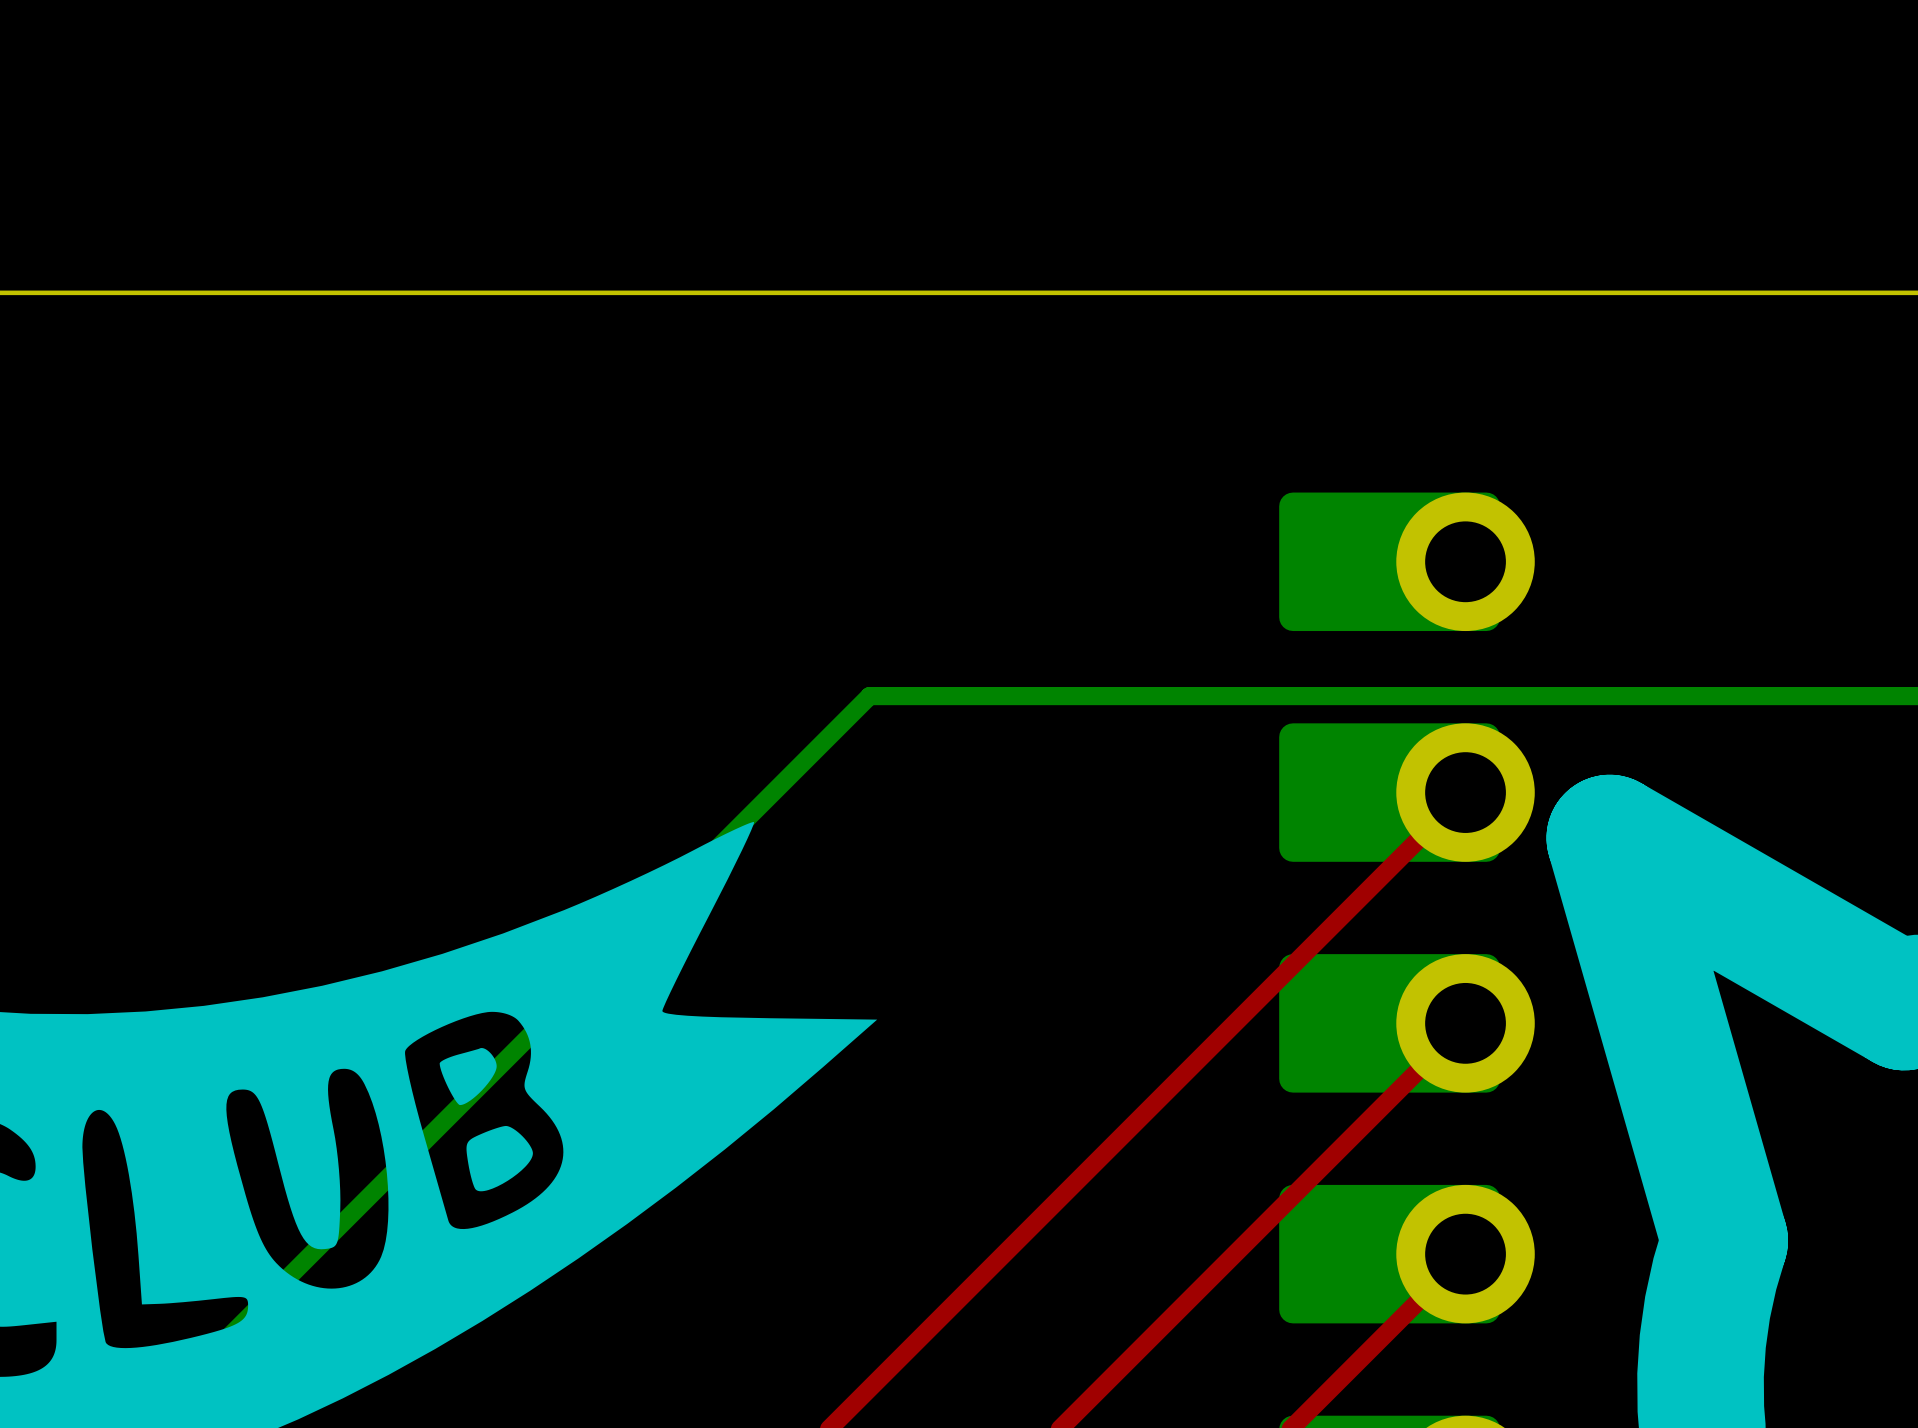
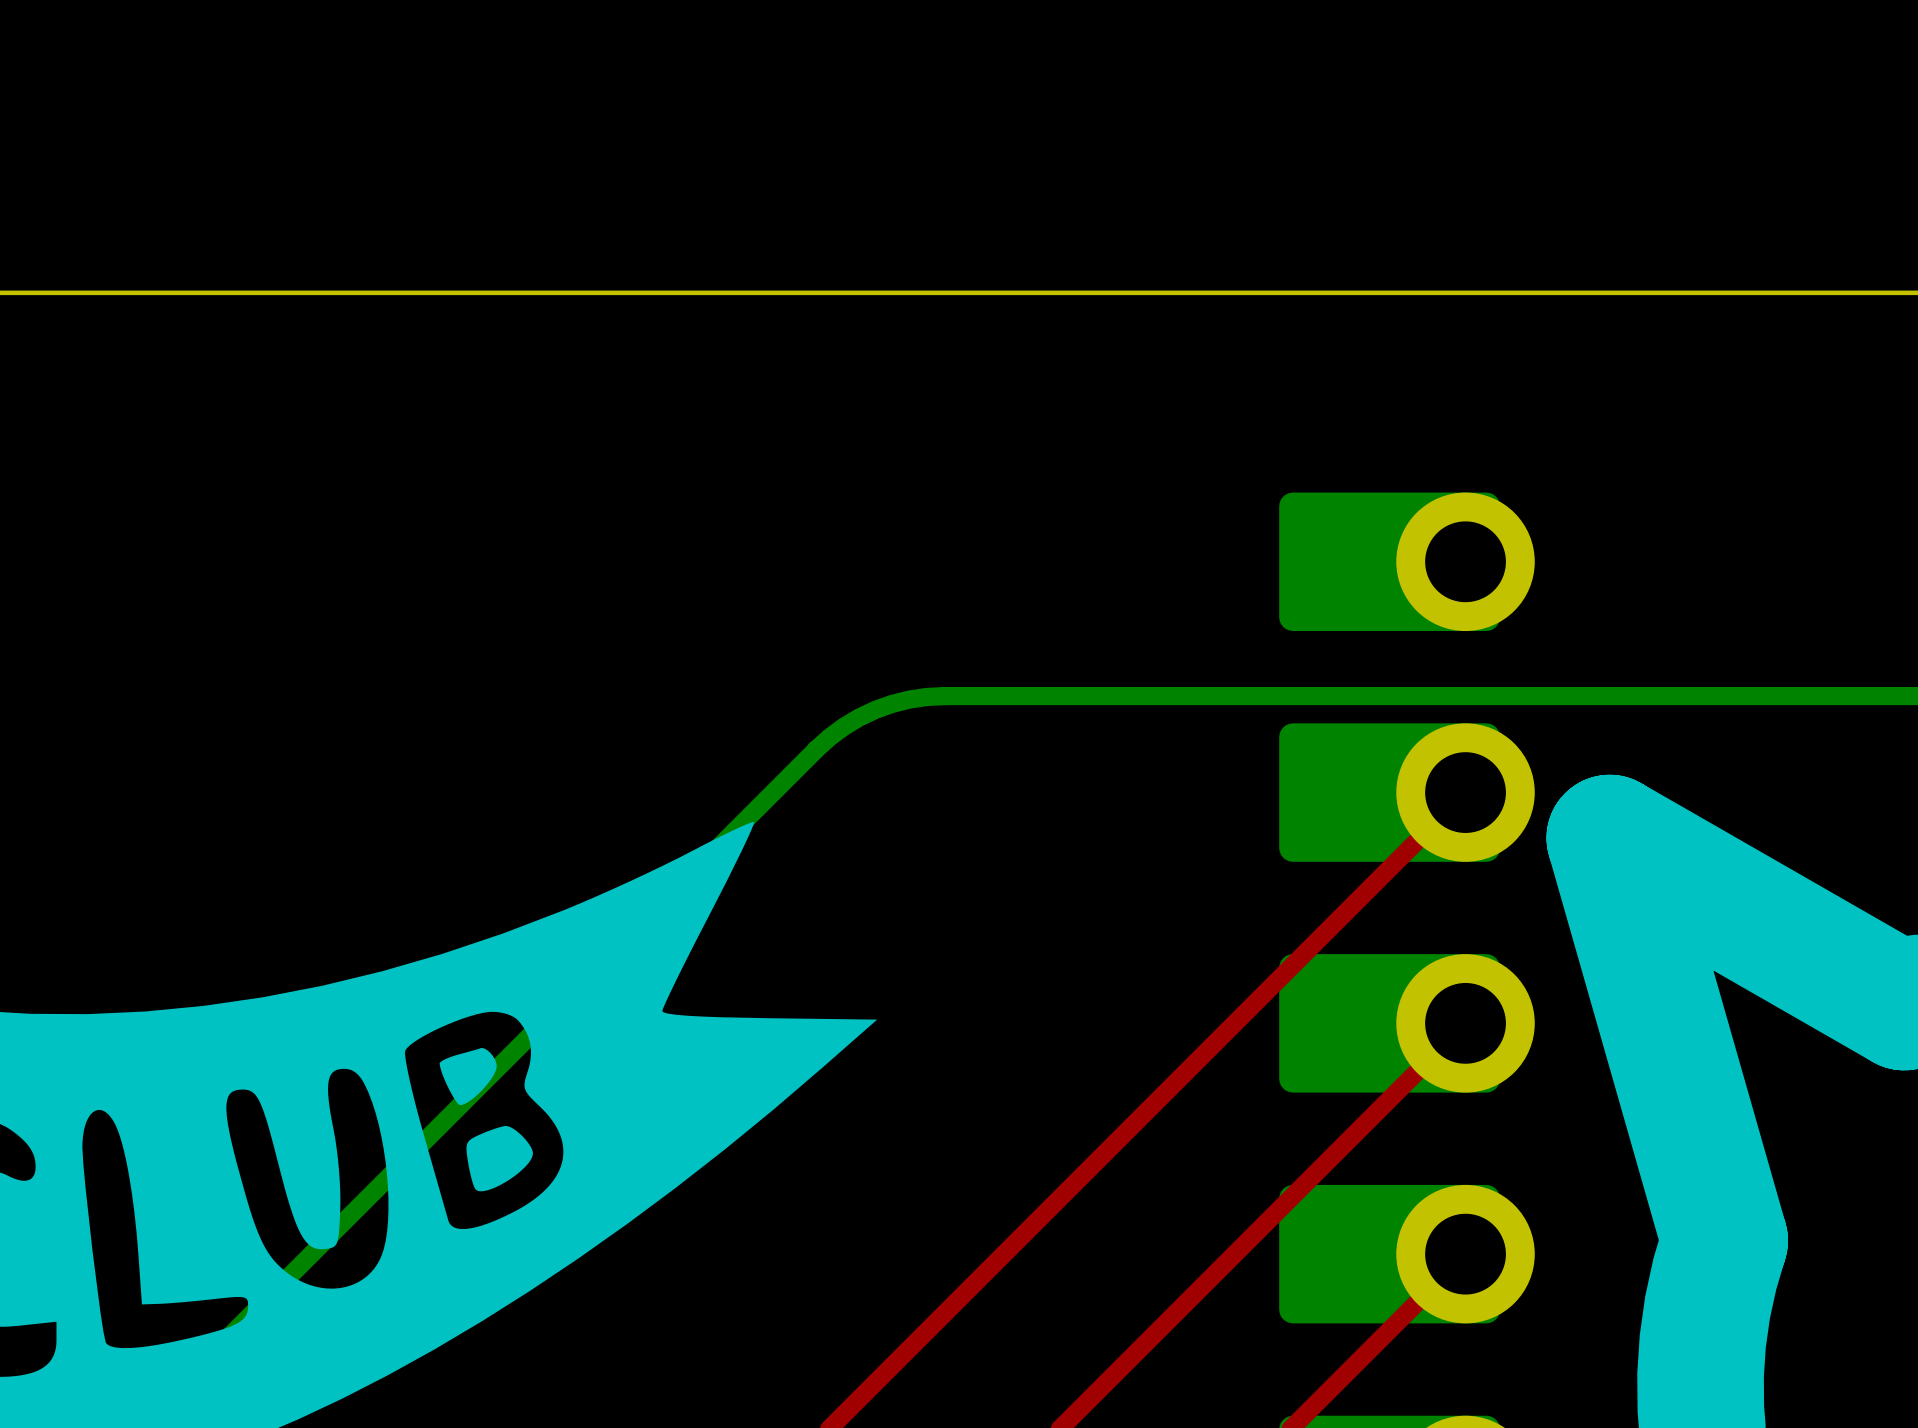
bottom track: (944, 696) (869, 696) (816, 749) -> (944, 696) (909, 699) (875, 709) (843, 726) (816, 749)

